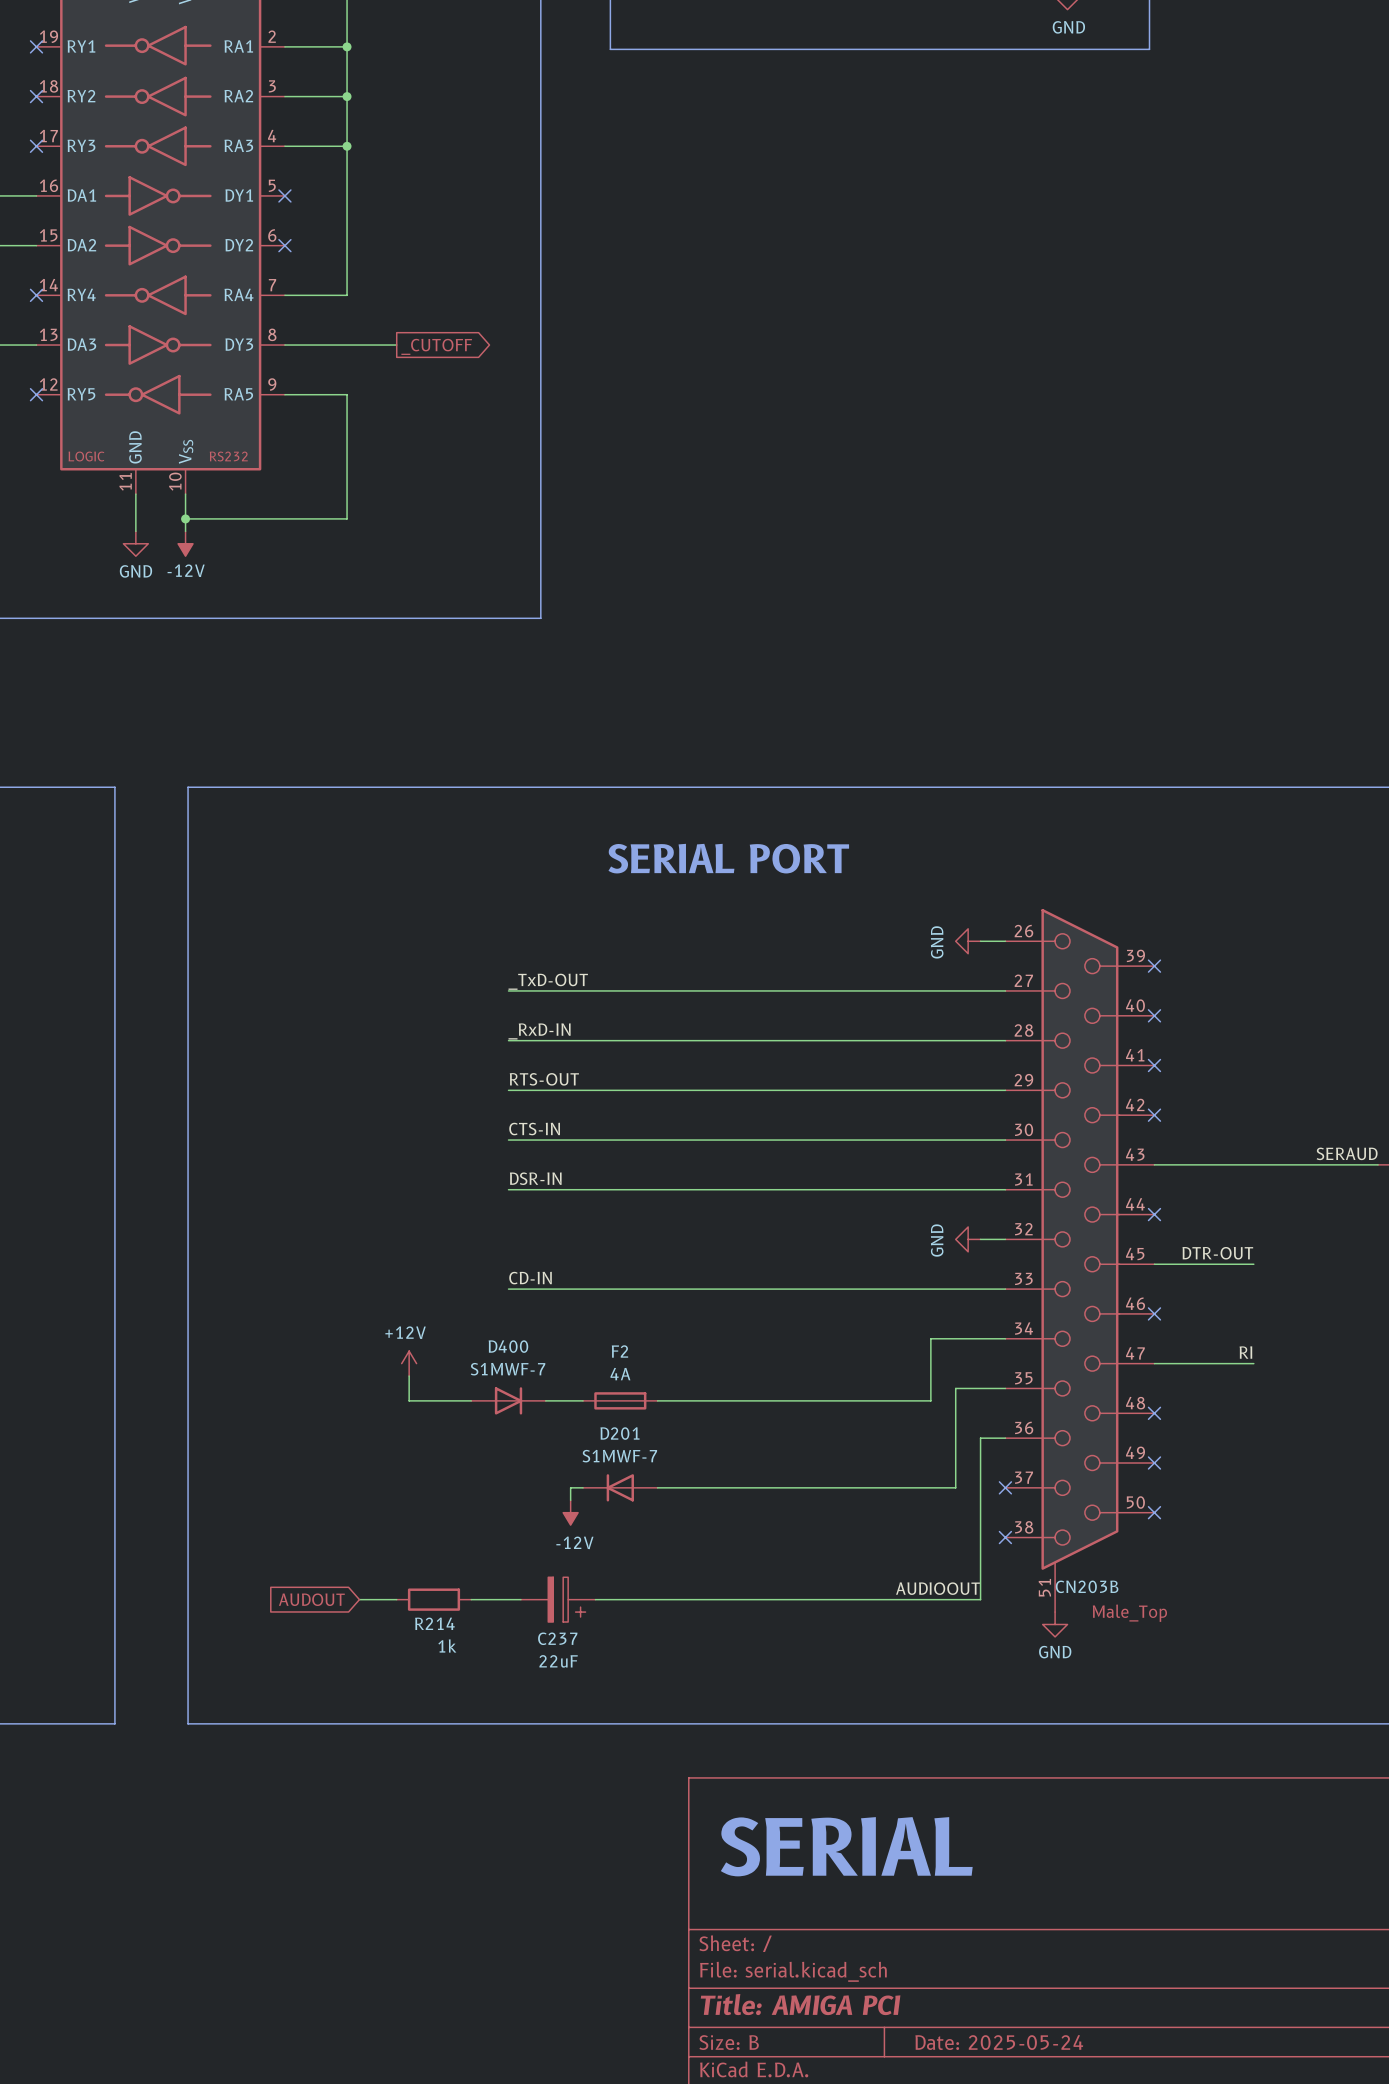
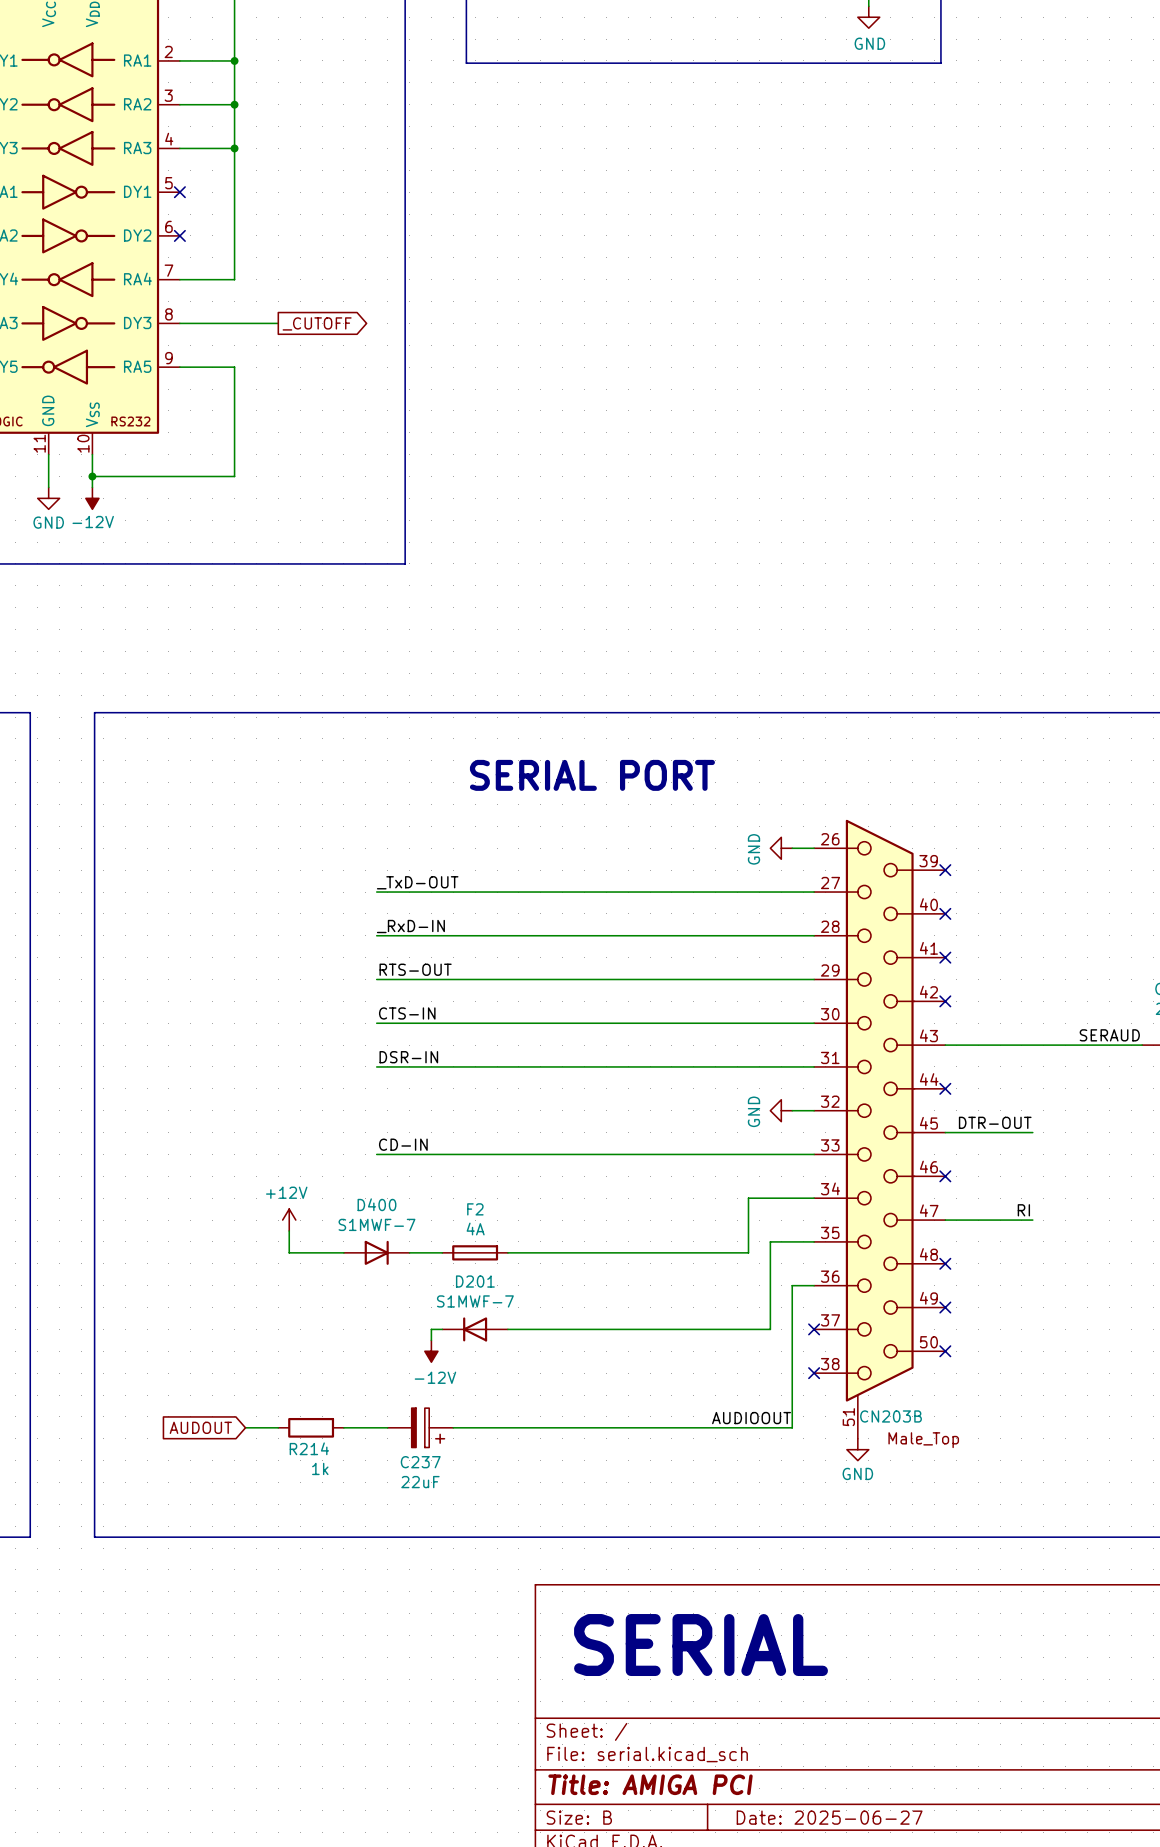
title block: Date: 2025-05-24 (999, 2042) -> Date: 2025-06-27 (829, 1817)

